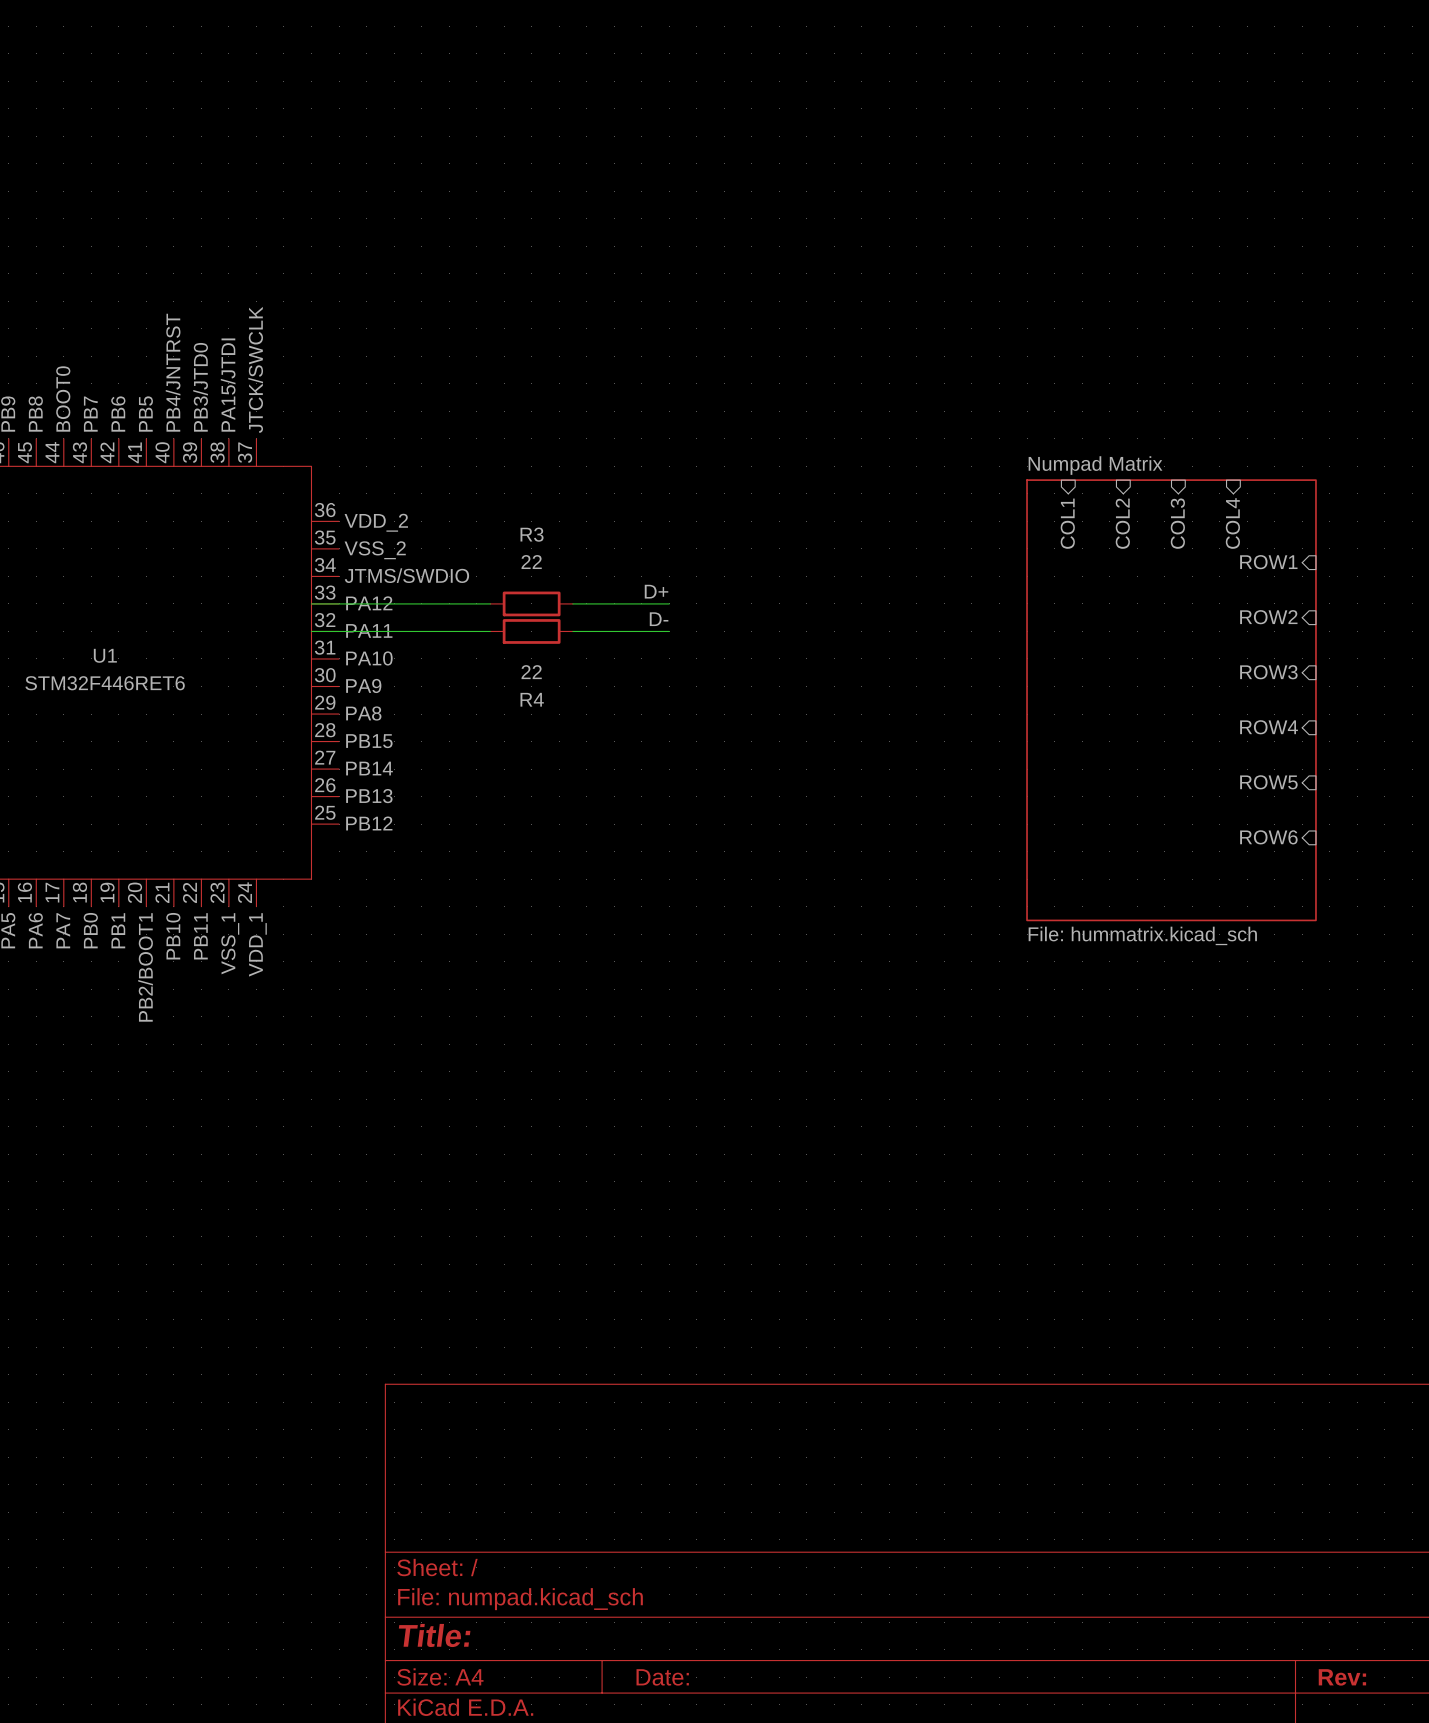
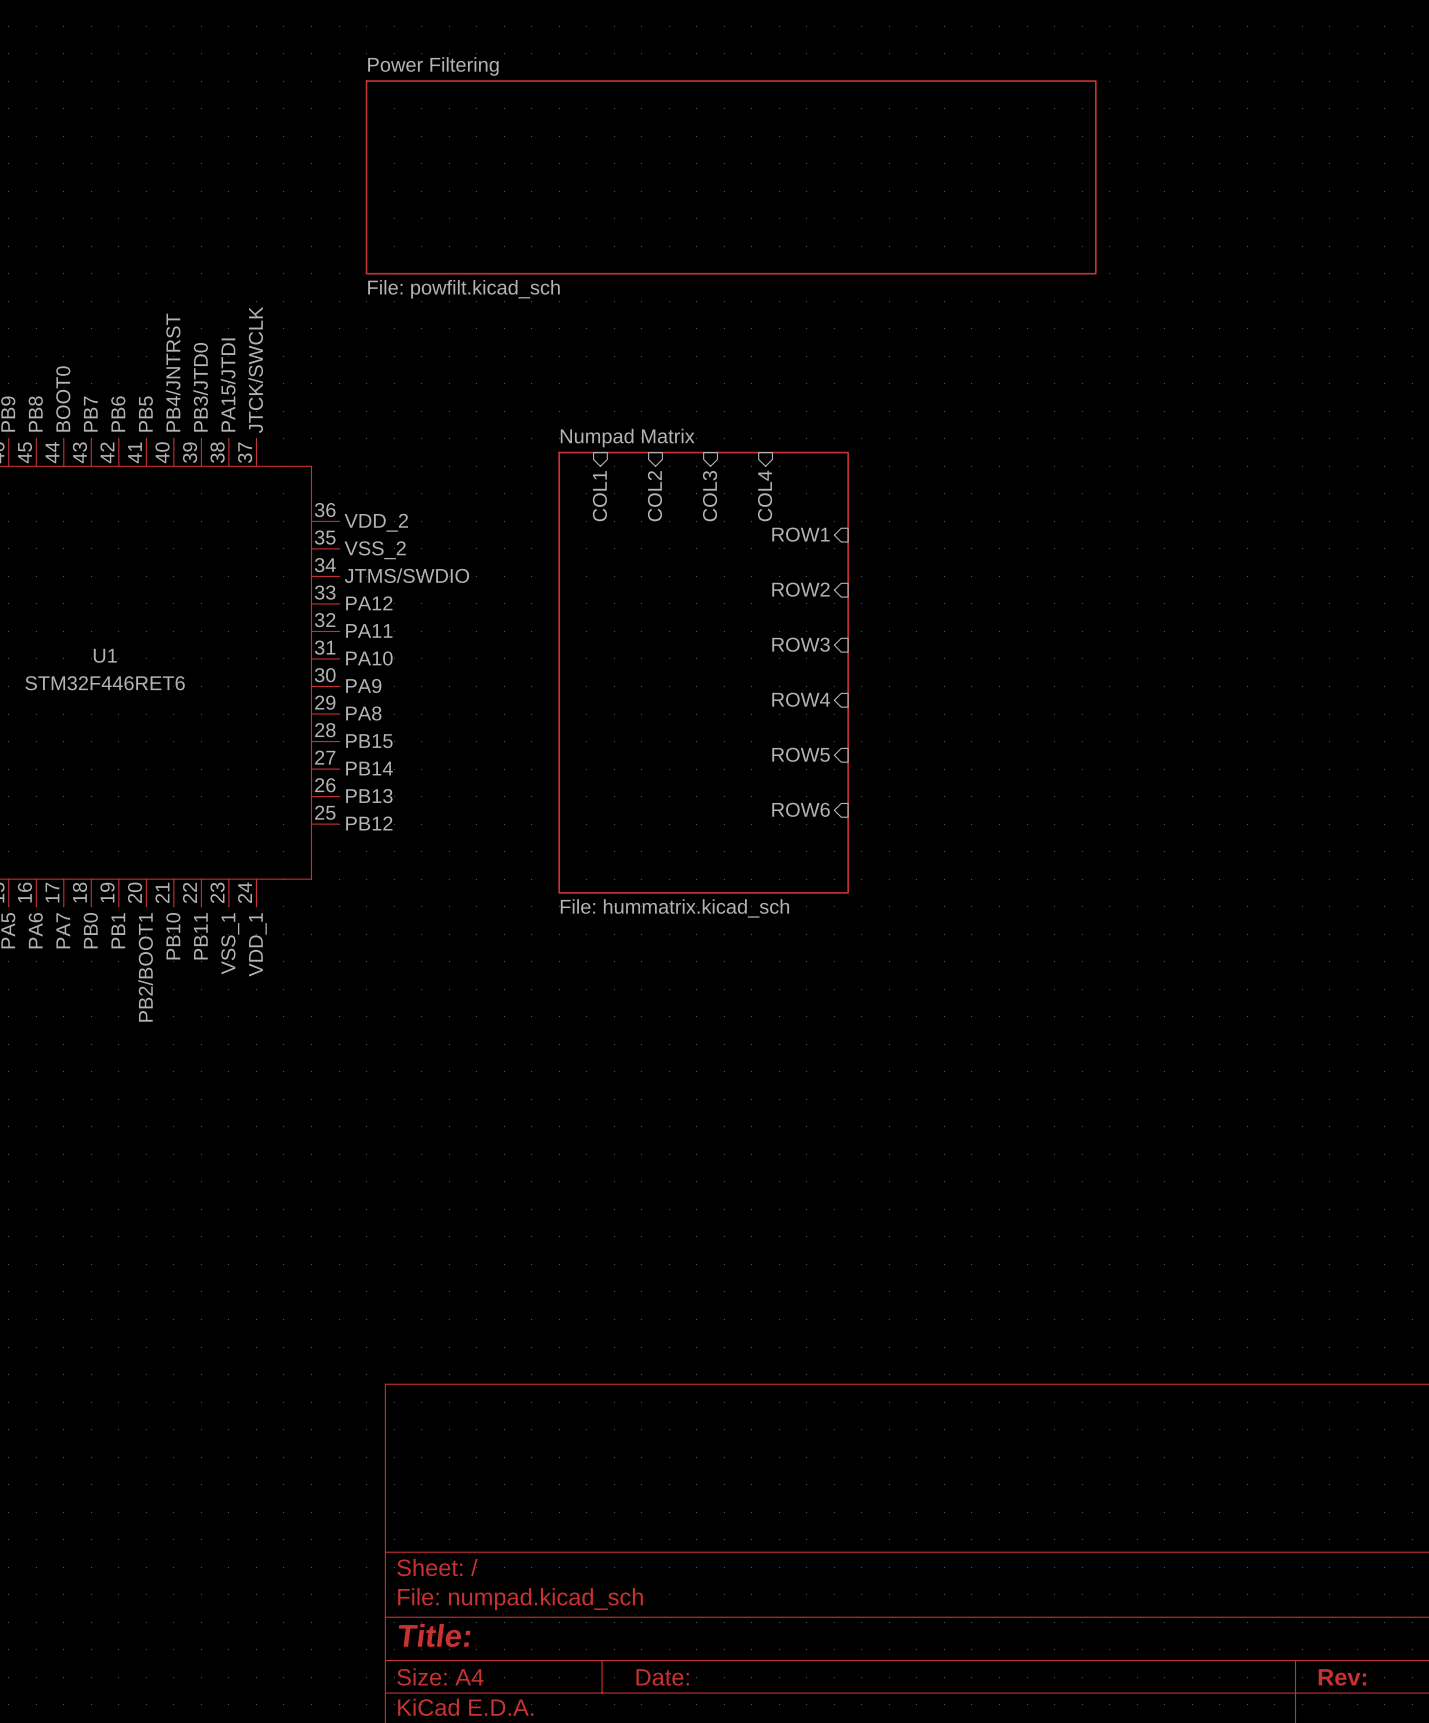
sheet Power Filtering: none -> File: powfilt.kicad_sch (731, 177)
sheet pin: none -> COL4 (765, 495)
sheet pin: none -> COL1 (599, 496)
sheet pin: none -> COL2 (654, 496)
sheet pin: none -> COL3 (710, 496)
sheet pin: COL1 (1067, 523) -> none
sheet pin: COL2 (1122, 523) -> none
sheet pin: COL3 (1177, 523) -> none
sheet pin: COL4 (1232, 523) -> none
sheet pin: none -> ROW1 (800, 534)
sheet pin: ROW1 (1268, 562) -> none
sheet pin: none -> ROW2 (800, 589)
label: D+ (656, 591) -> none
wire: (311, 603) (490, 603) -> none
R3: 22 (531, 603) -> none
wire: (572, 603) (669, 603) -> none
sheet pin: ROW2 (1268, 617) -> none
label: D- (659, 619) -> none
wire: (311, 631) (490, 631) -> none
R4: 22 (531, 631) -> none
wire: (572, 631) (669, 631) -> none
sheet pin: none -> ROW3 (801, 644)
sheet Numpad Matrix: none -> File: hummatrix.kicad_sch (703, 672)
sheet pin: ROW3 (1268, 672) -> none
sheet pin: none -> ROW4 (801, 699)
sheet Numpad Matrix: File: hummatrix.kicad_sch (1171, 700) -> none
sheet pin: ROW4 (1269, 727) -> none
sheet pin: none -> ROW5 (801, 754)
sheet pin: ROW5 (1268, 782) -> none
sheet pin: none -> ROW6 (801, 809)
sheet pin: ROW6 (1268, 837) -> none

